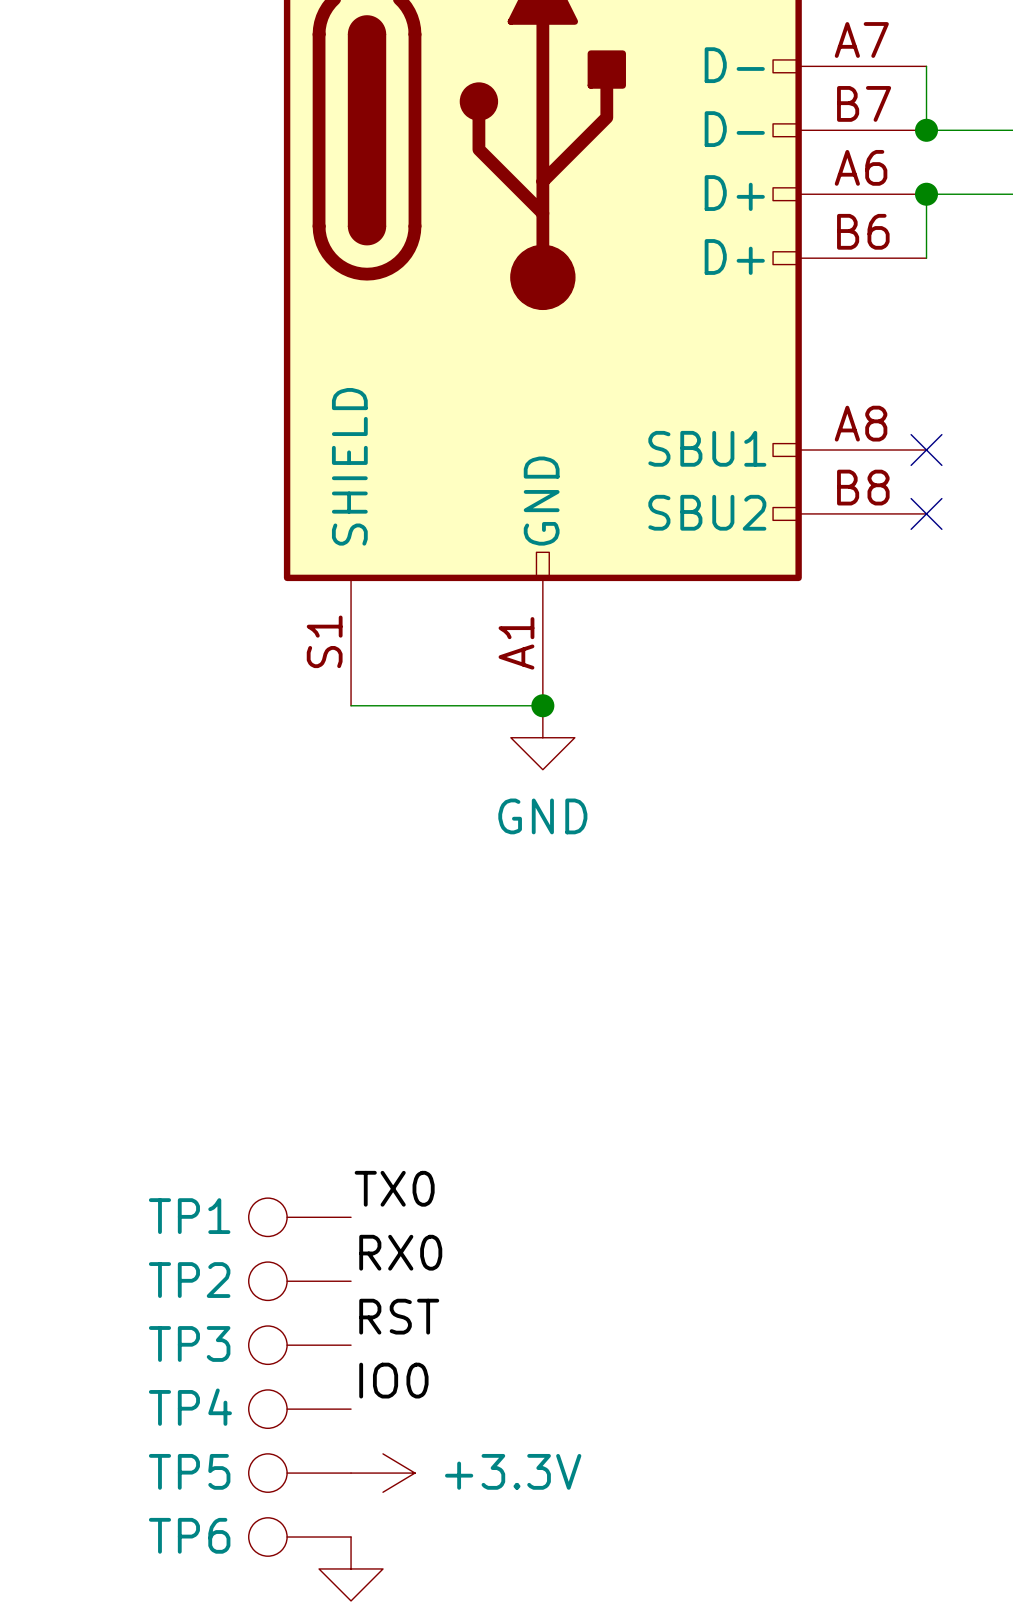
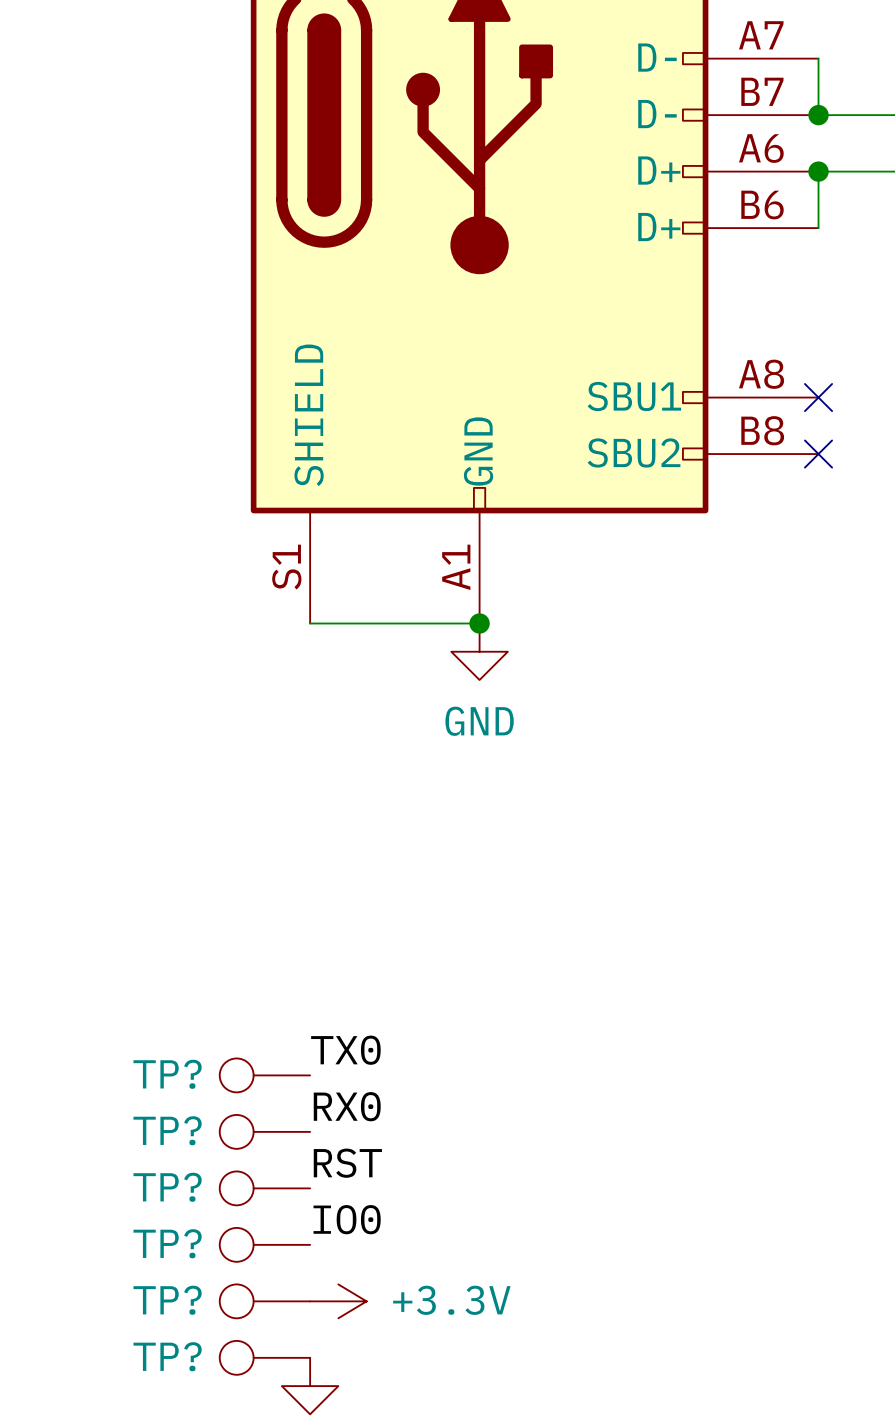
TP1 name: TP1 (189, 1216) -> TP? (167, 1074)
TP2 name: TP2 (189, 1280) -> TP? (167, 1130)
TP3 name: TP3 (189, 1343) -> TP? (167, 1187)
TP4 name: TP4 (190, 1407) -> TP? (167, 1243)
TP5 name: TP5 (189, 1471) -> TP? (167, 1300)
TP6 name: TP6 (189, 1535) -> TP? (167, 1356)

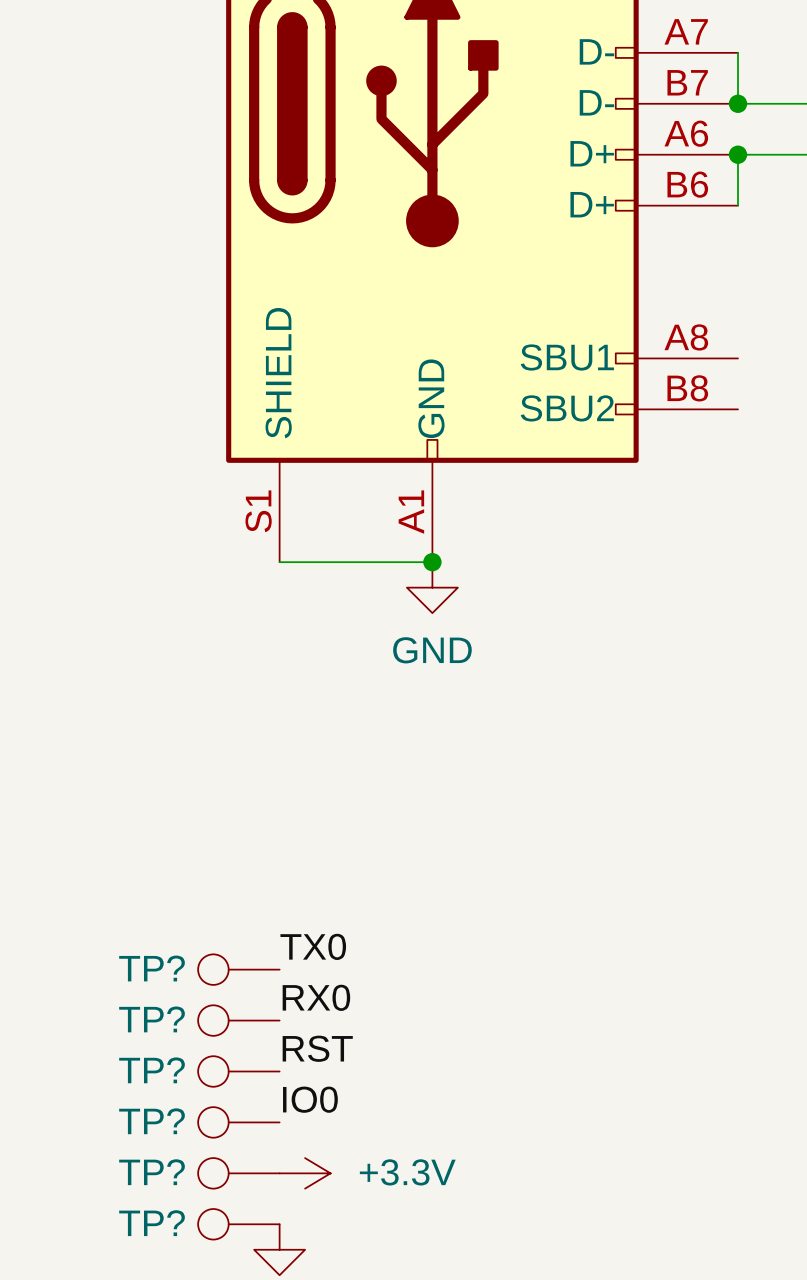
no-connect mark: (818, 397) -> none
no-connect mark: (818, 454) -> none

